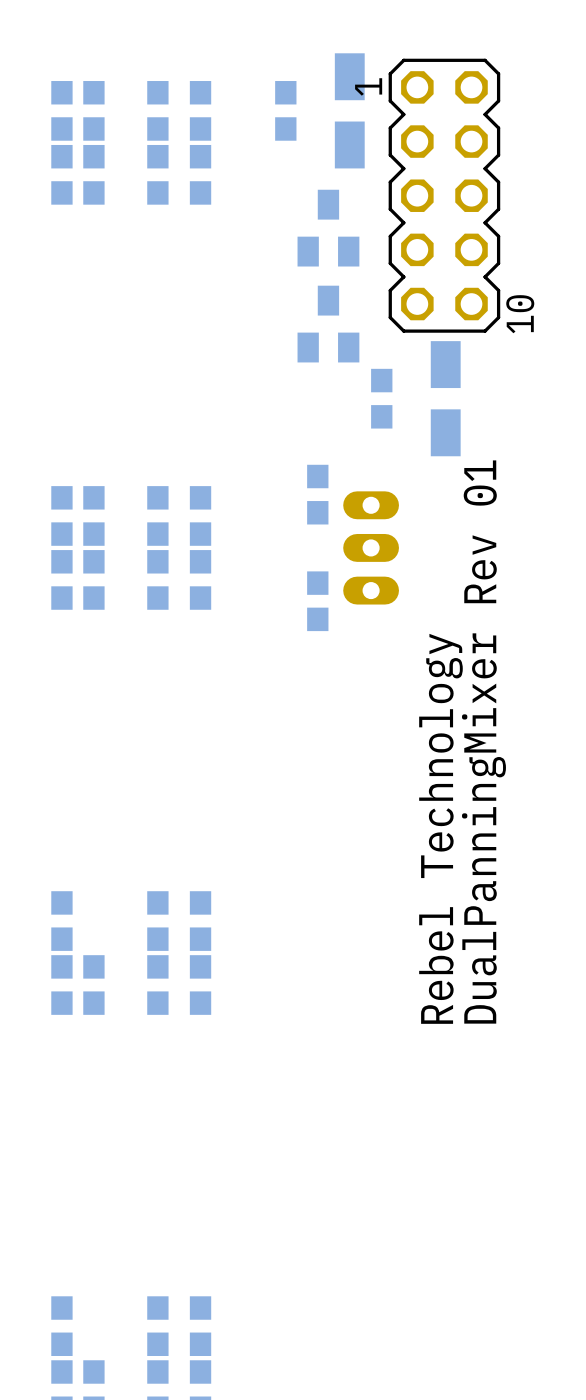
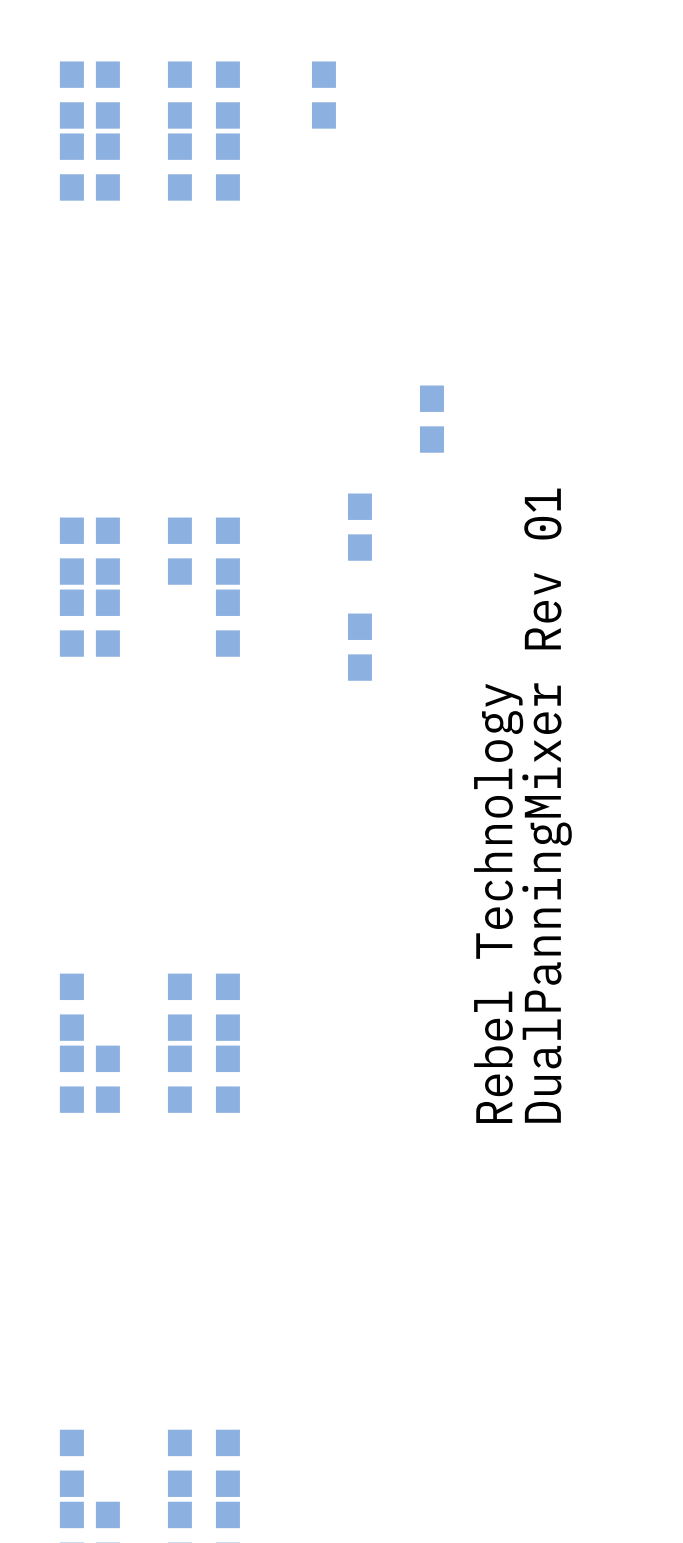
part: (349, 110) -> none
part: (444, 195) -> none
part: (328, 228) -> none
part: (328, 324) -> none
part: (445, 398) -> none
part: (371, 547) -> none
part: (157, 579) -> none

